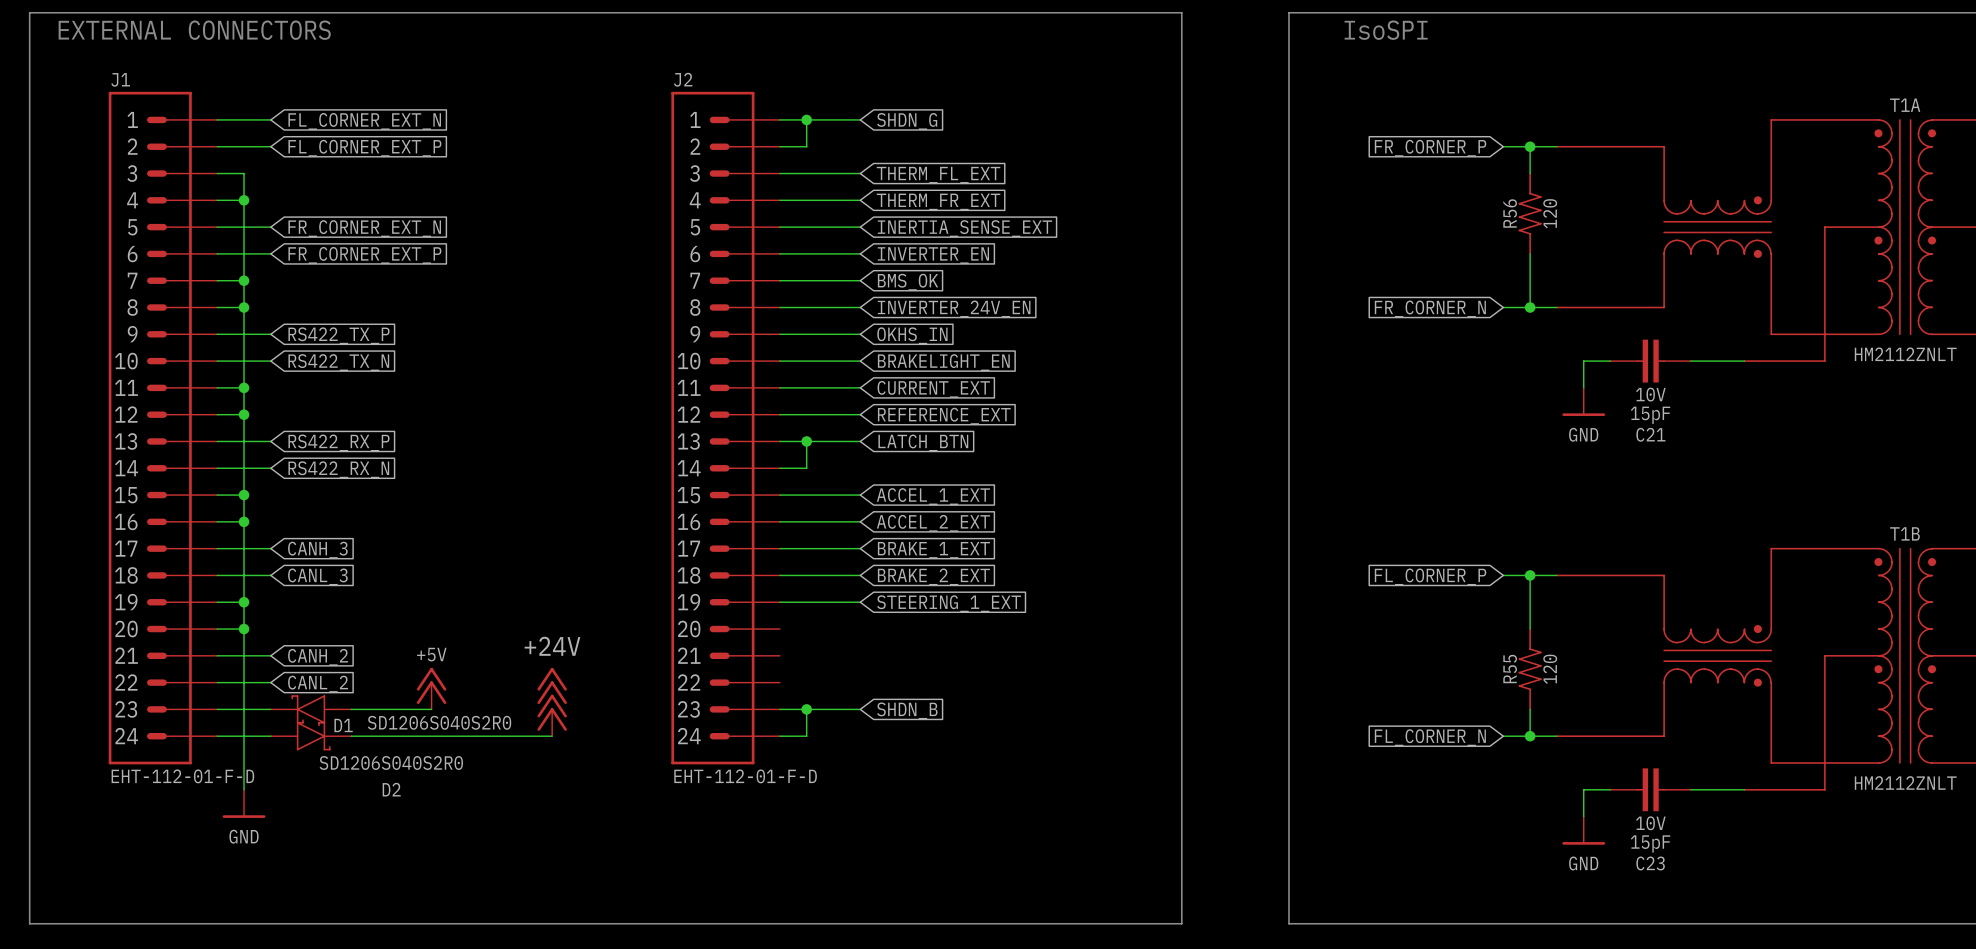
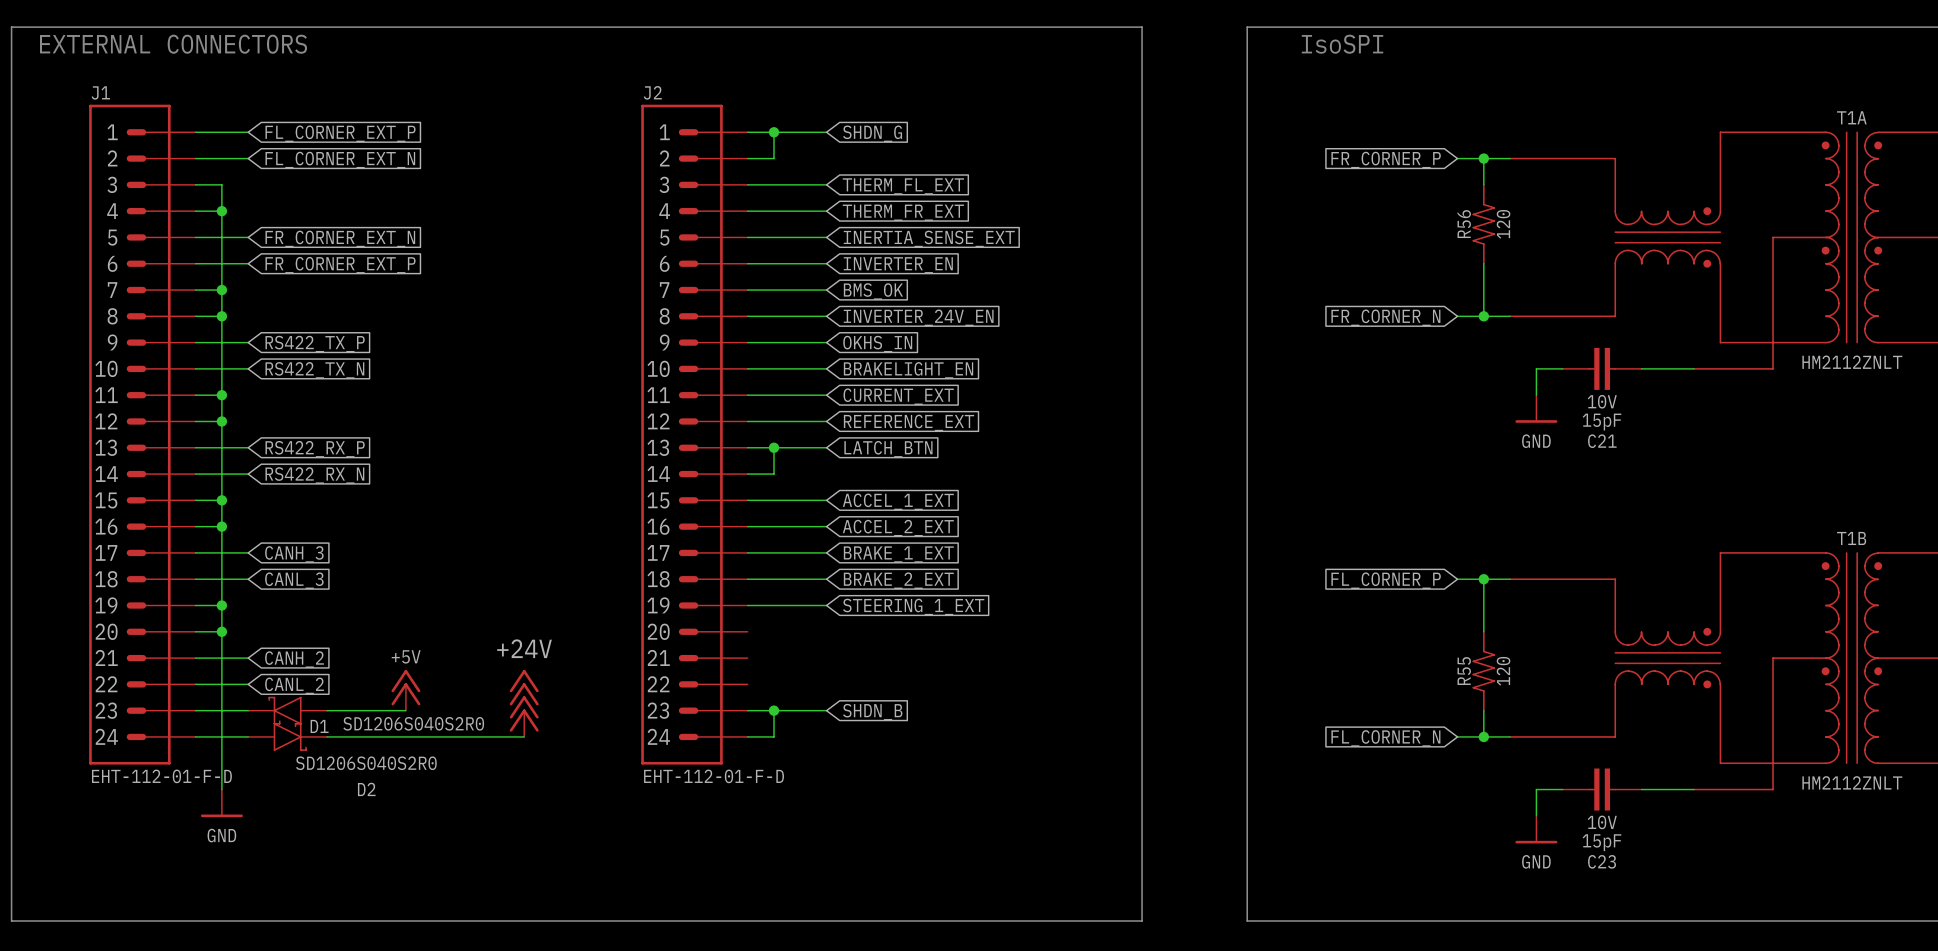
global label: FL_CORNER_EXT_N (364, 121) -> FL_CORNER_EXT_P (340, 133)
global label: FL_CORNER_EXT_P (364, 148) -> FL_CORNER_EXT_N (340, 160)

